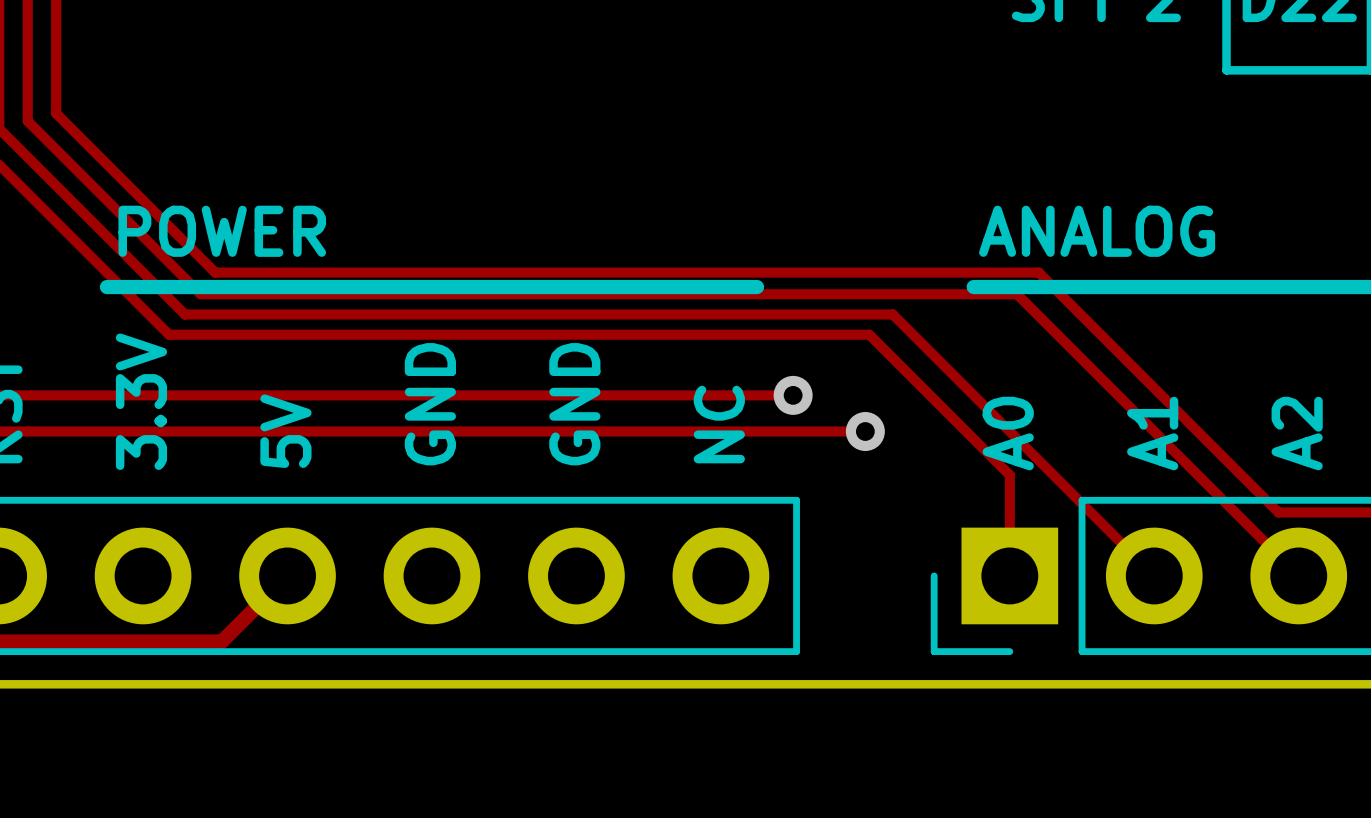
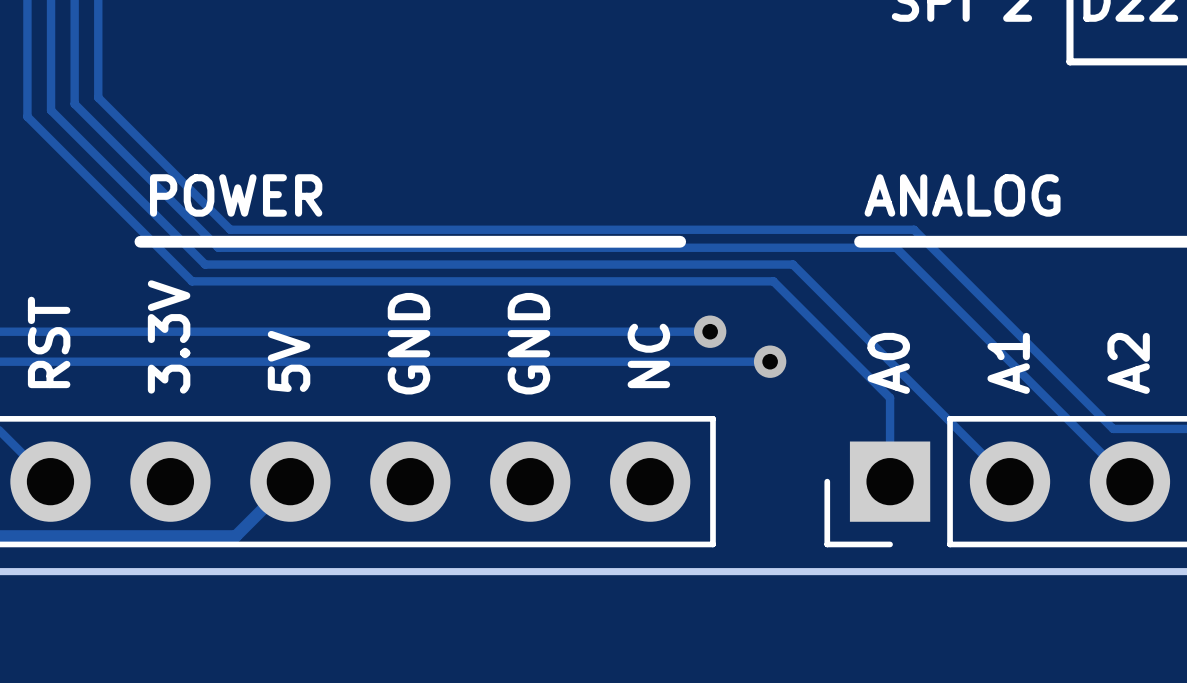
text position: GND (430, 404) -> GND (408, 343)
text position: GND (574, 404) -> GND (528, 343)

